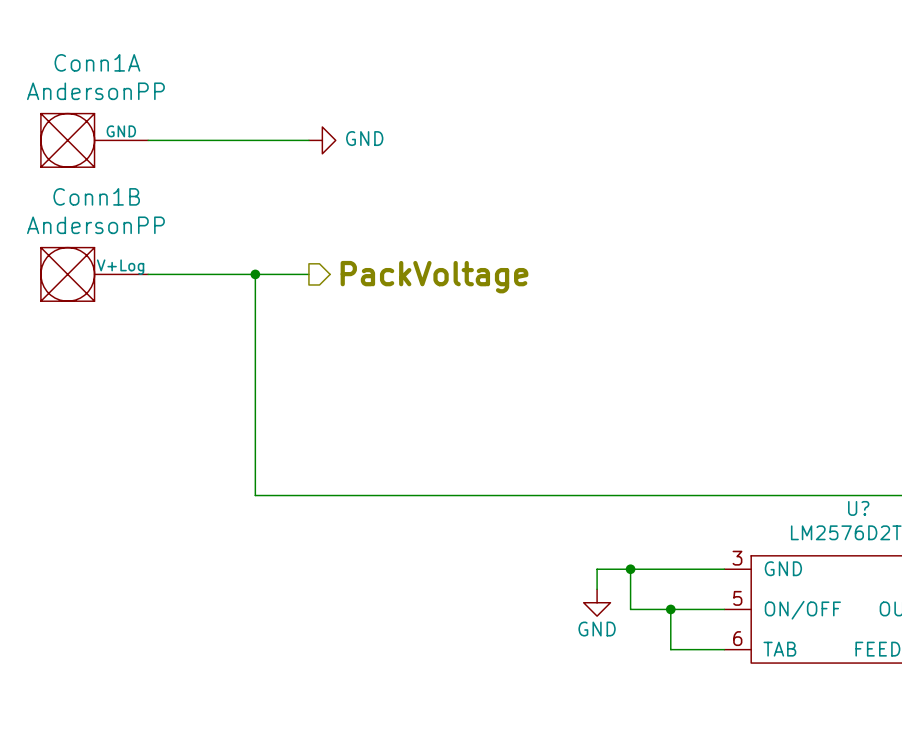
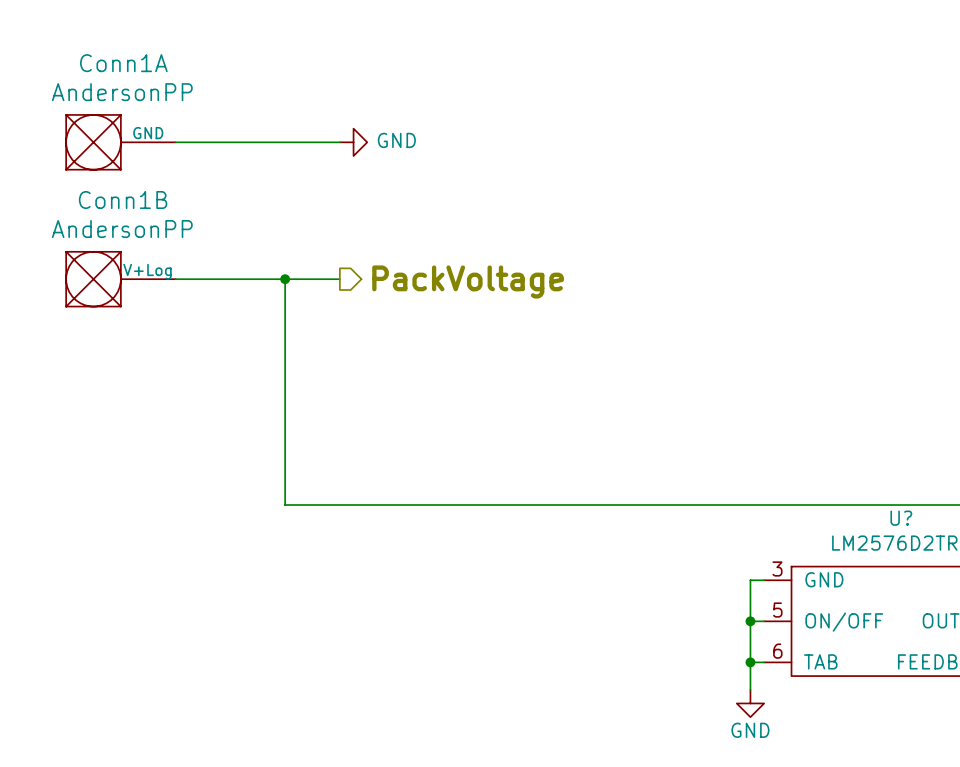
wire: (630, 569) (630, 609) (710, 609) -> none
junction: (630, 569) -> none
wire: (710, 569) (597, 569) (597, 589) -> (750, 580) (750, 689)
power symbol position: GND (597, 602) -> GND (750, 703)
wire: (670, 609) (670, 649) (710, 649) -> none
junction: (670, 609) -> none
junction: none -> (750, 621)
junction: none -> (750, 662)

